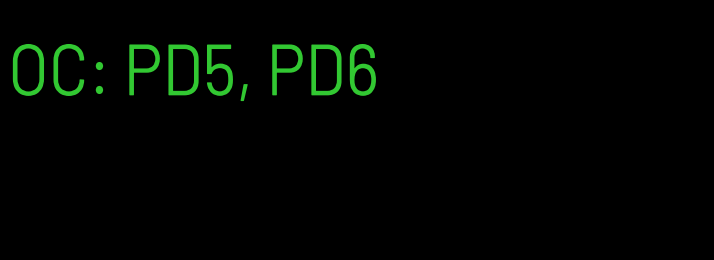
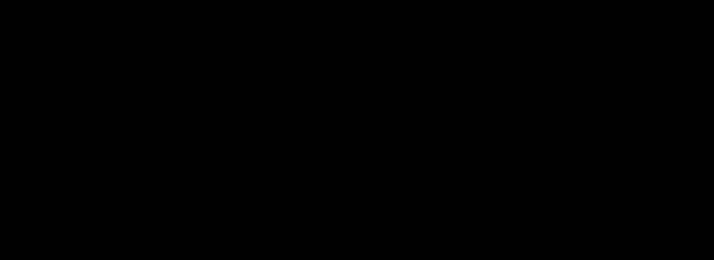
text: OC: PD5, PD6 (194, 72) -> none

